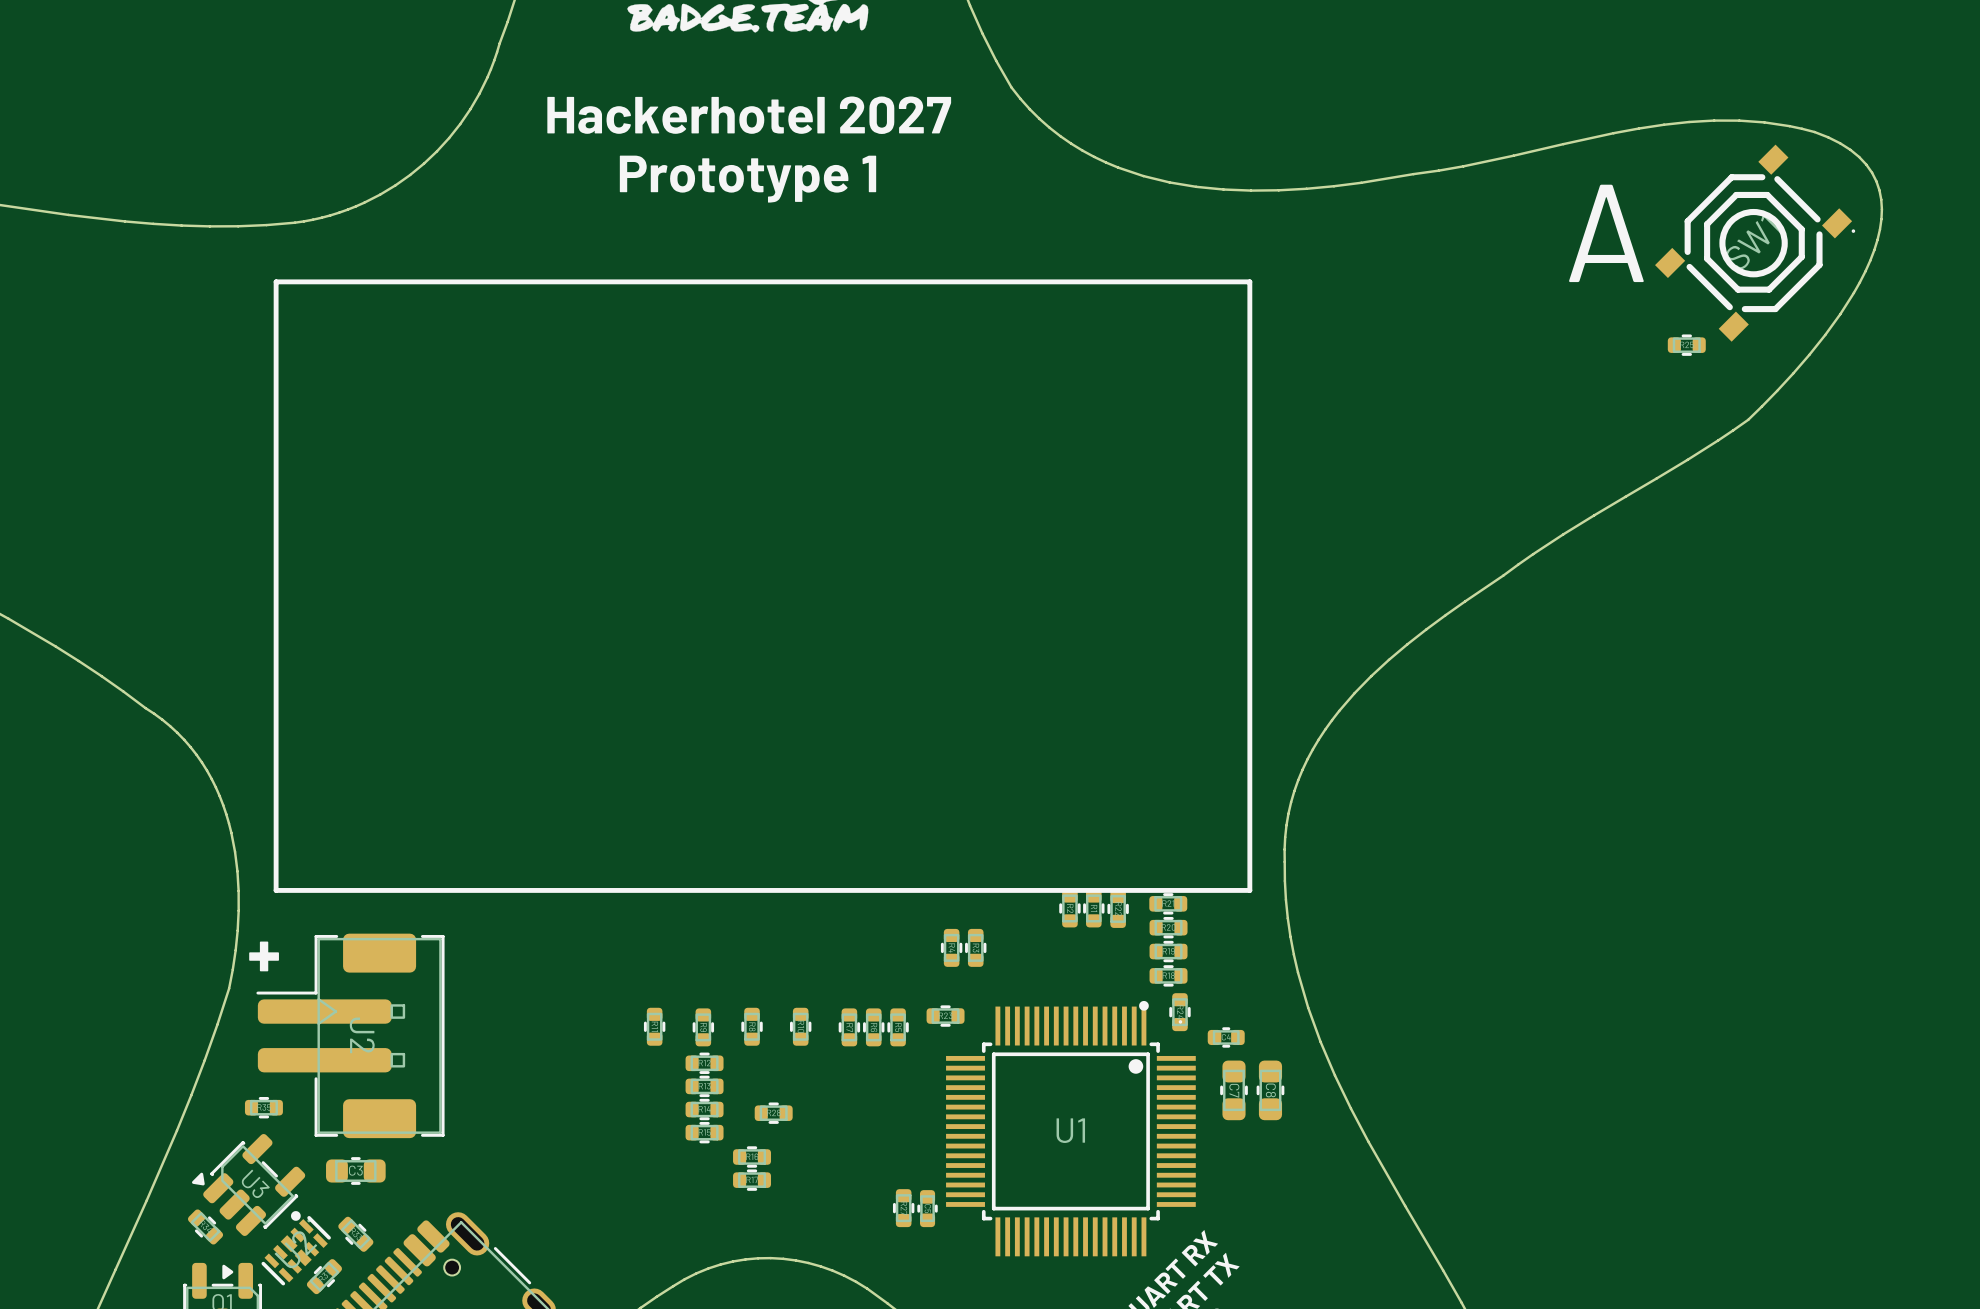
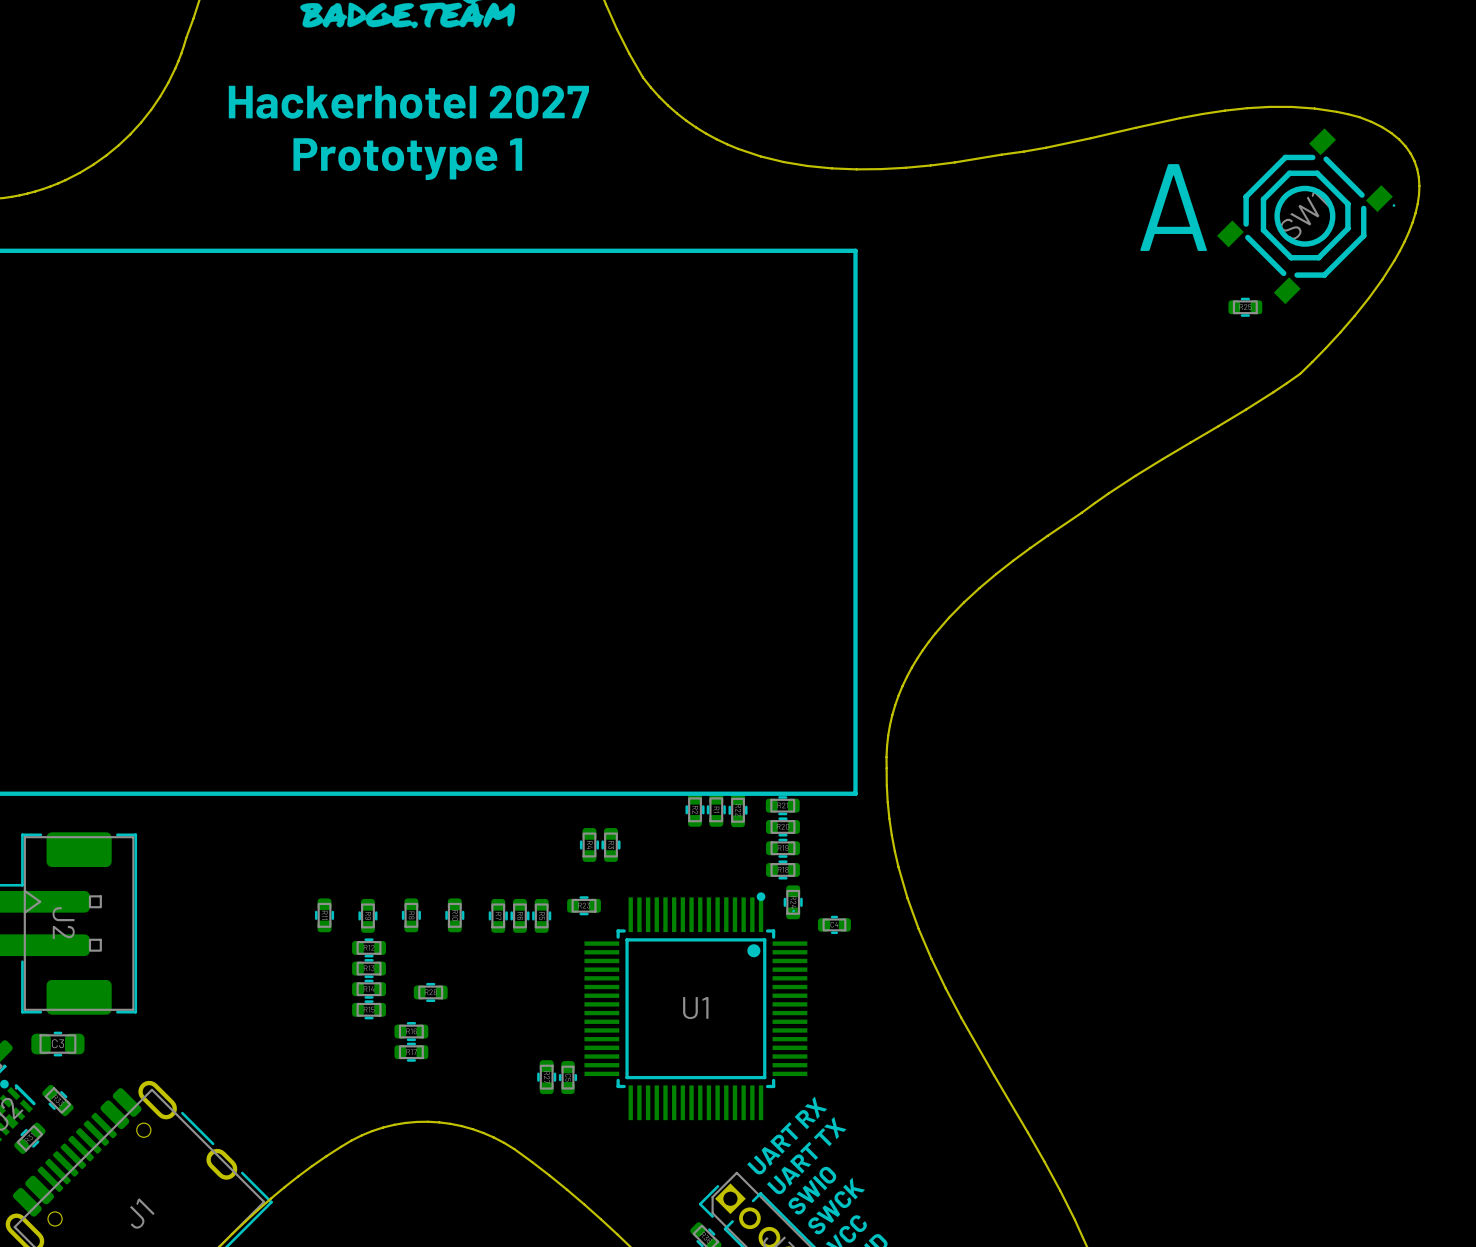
C7: (1234, 1090) -> none
C8: (1270, 1090) -> none

